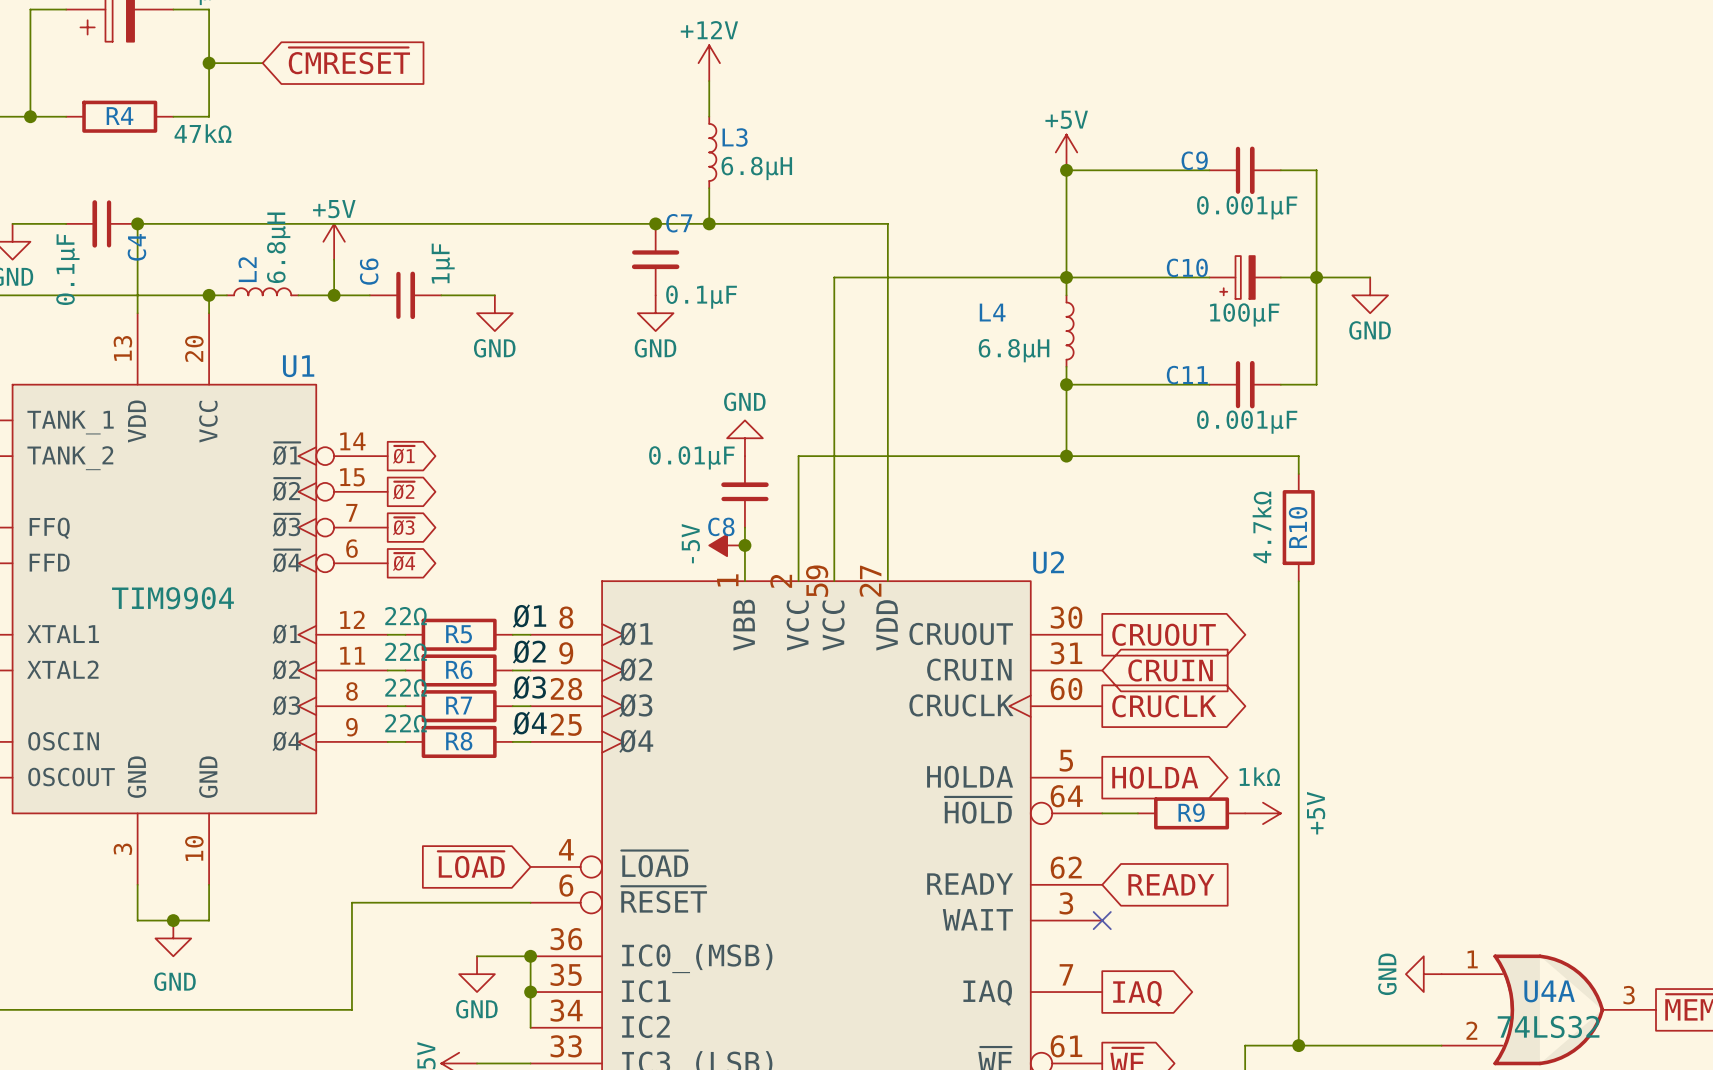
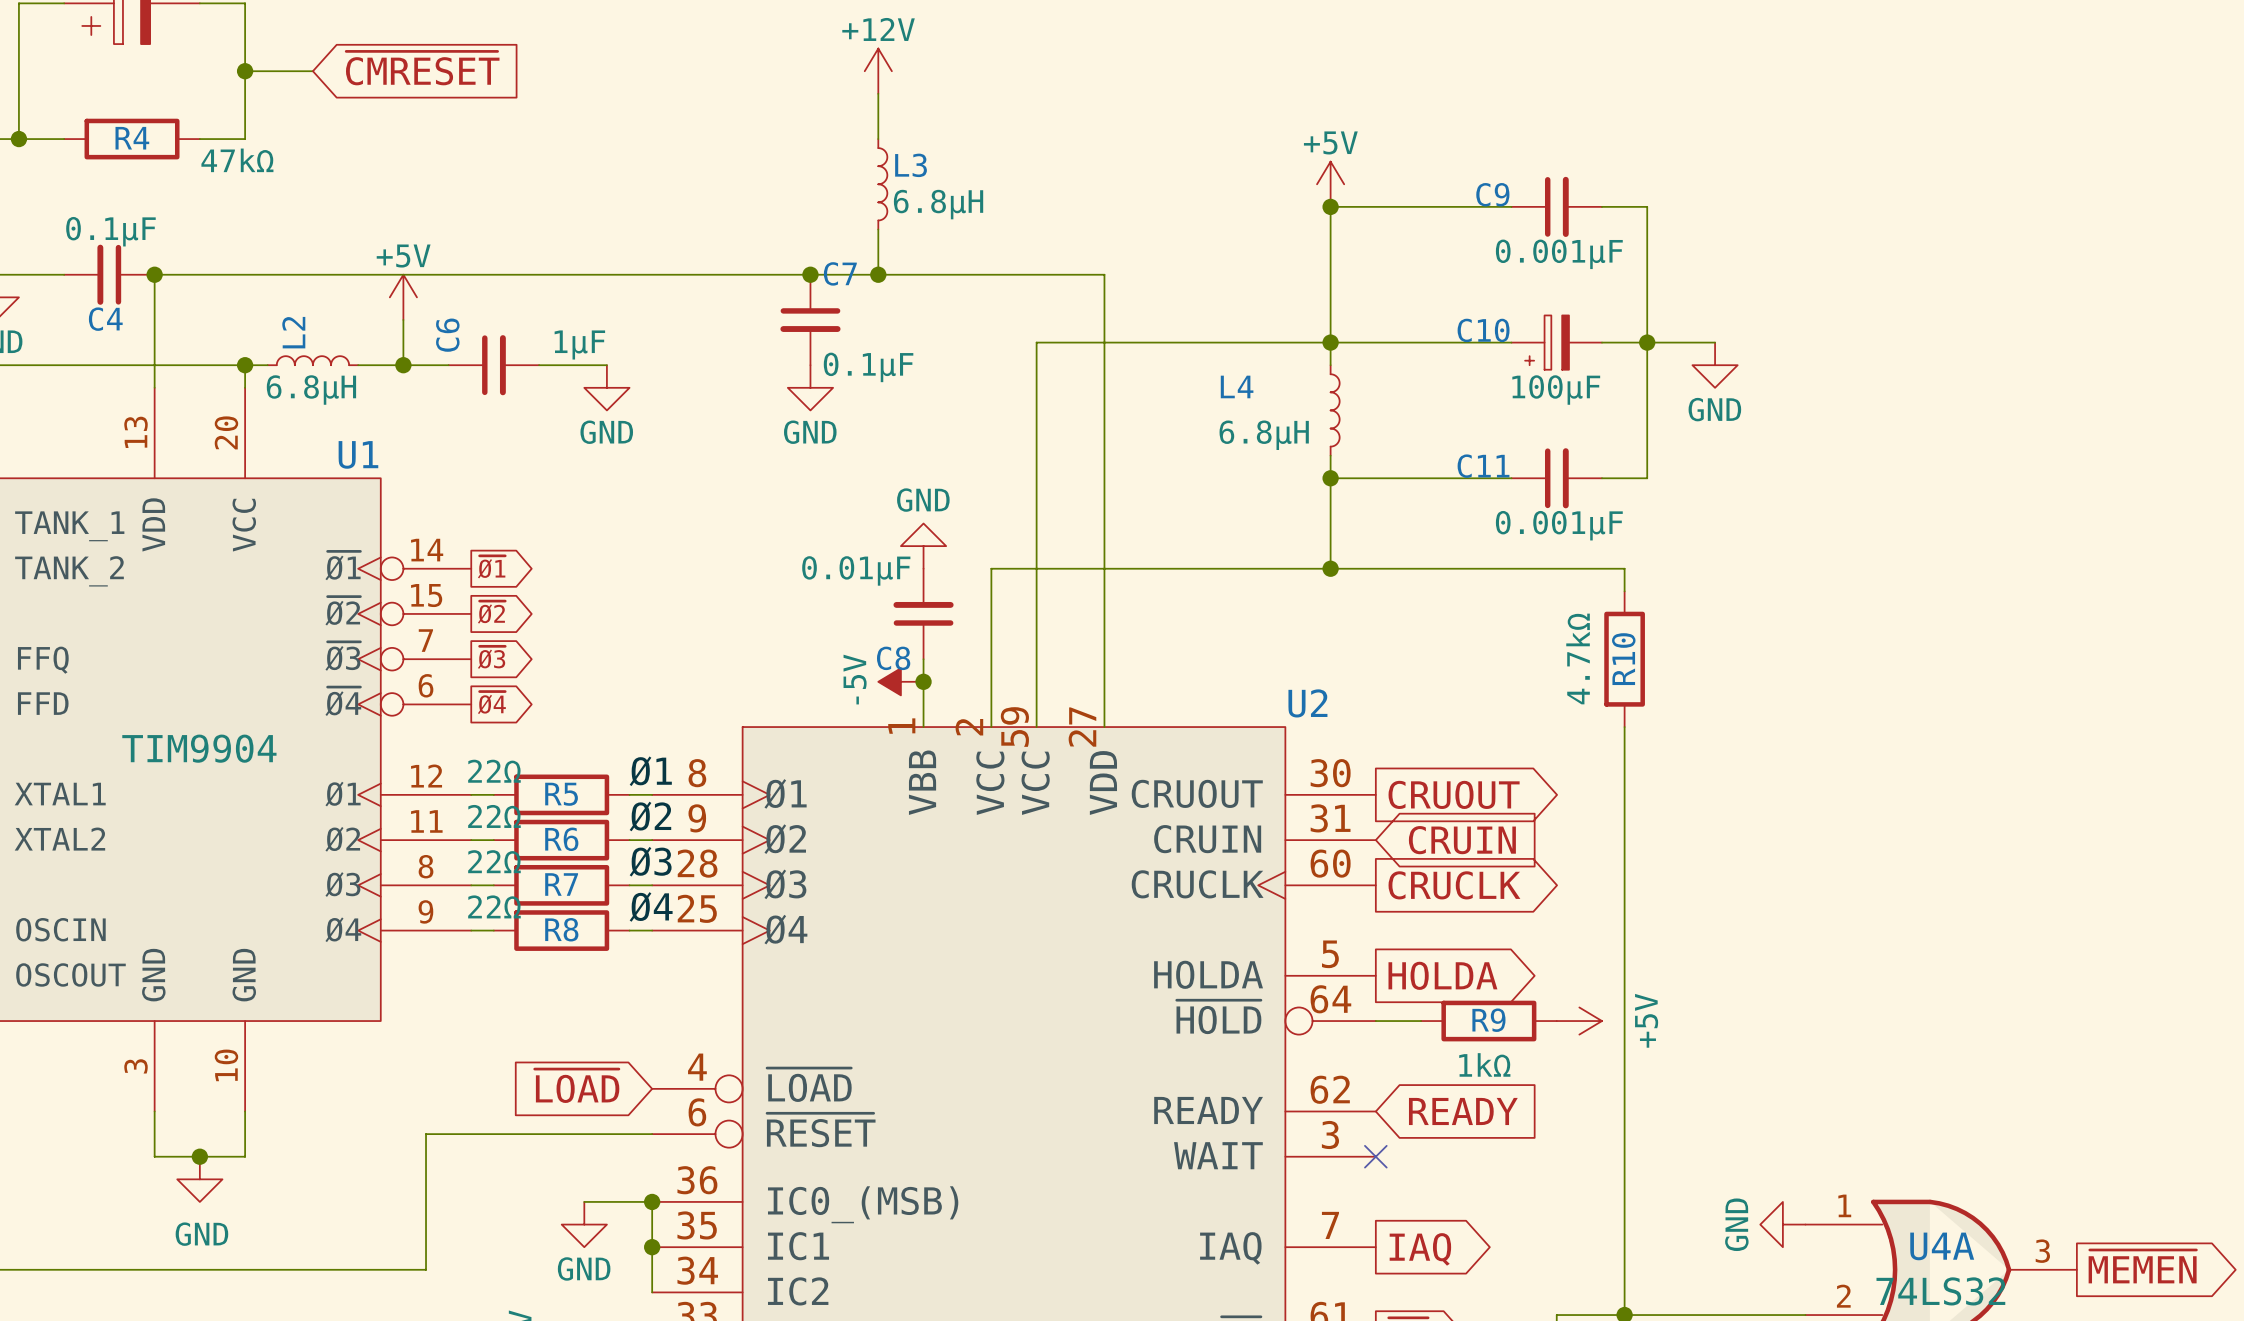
C4 name rotation: 0° (136, 247) -> 90° clockwise (105, 319)
L2 value rotation: 0° (278, 247) -> 90° clockwise (311, 390)
C6 value rotation: 0° (443, 263) -> 90° clockwise (579, 344)
C4 value rotation: 0° (67, 269) -> 90° clockwise (110, 231)
C4 value position: 0.1µF (67, 269) -> 0.1µF (110, 231)
R9 value position: 1kΩ (1259, 776) -> 1kΩ (1484, 1064)

